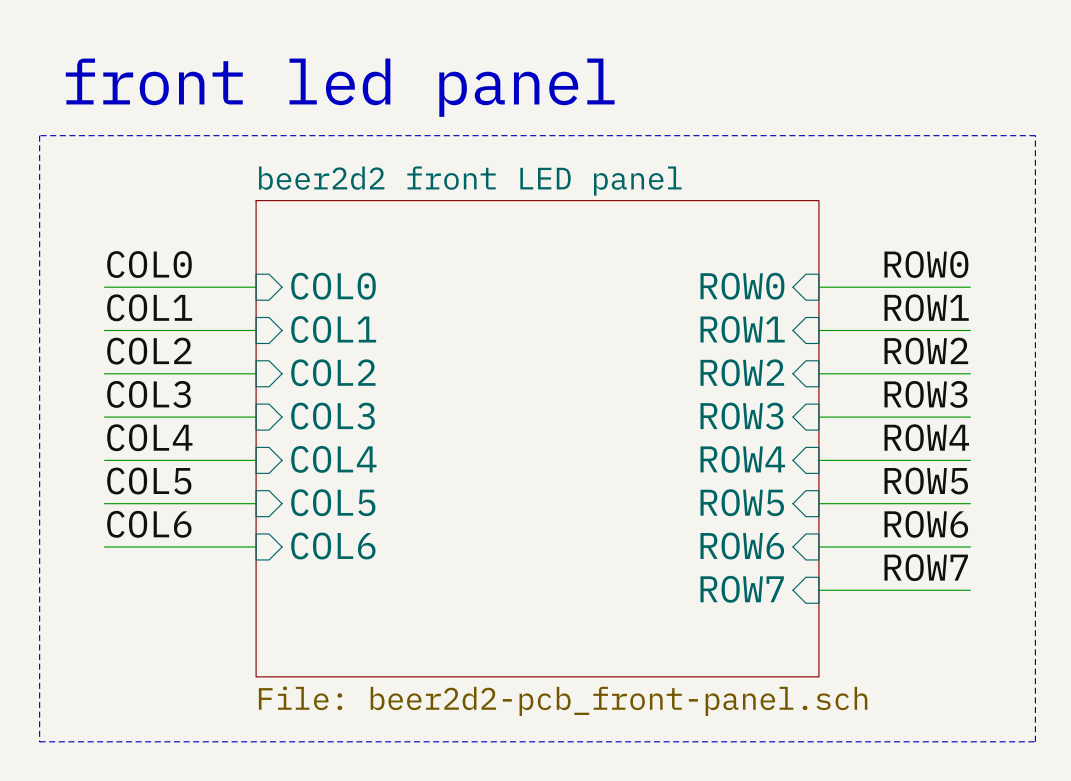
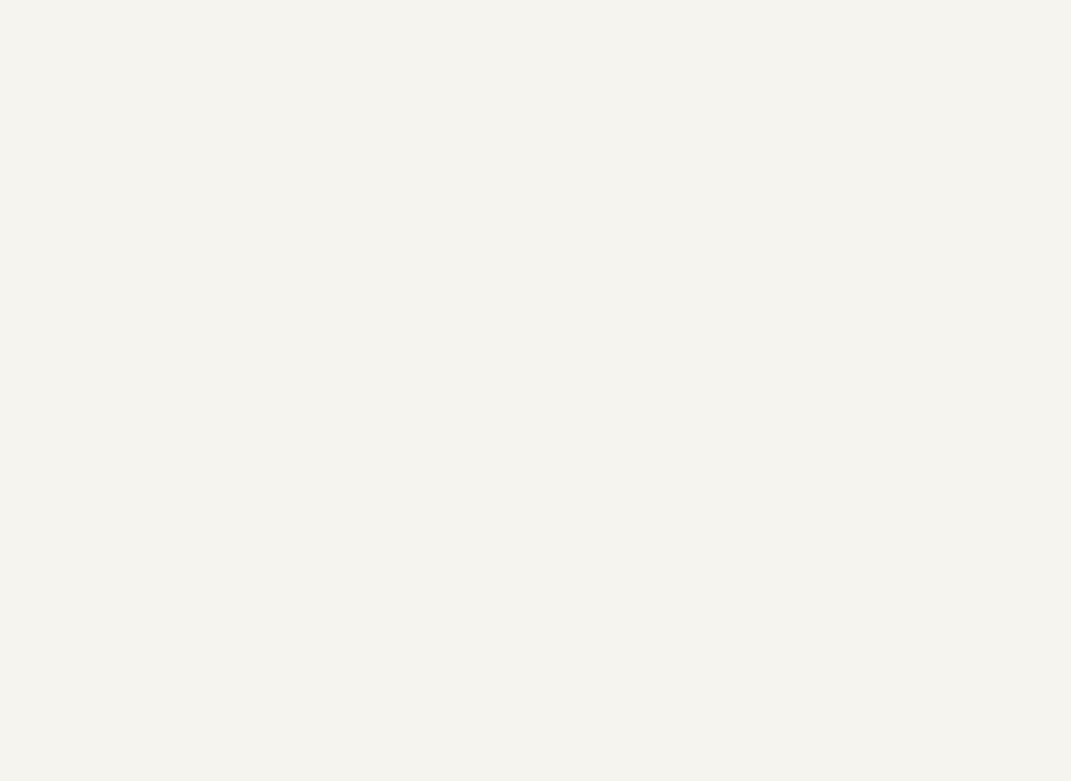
text: front led panel (340, 87) -> none
line: (39, 135) (39, 741) (1035, 741) (1035, 135) (39, 135) -> none
label: COL0 (149, 264) -> none
label: ROW0 (926, 264) -> none
sheet pin: COL0 (333, 286) -> none
sheet pin: ROW0 (742, 286) -> none
wire: (104, 287) (256, 287) -> none
wire: (818, 287) (970, 287) -> none
label: COL1 (149, 307) -> none
label: ROW1 (926, 307) -> none
sheet pin: COL1 (333, 329) -> none
sheet pin: ROW1 (742, 329) -> none
wire: (104, 330) (256, 330) -> none
wire: (818, 330) (970, 330) -> none
label: COL2 (149, 351) -> none
label: ROW2 (926, 351) -> none
sheet pin: COL2 (333, 372) -> none
sheet pin: ROW2 (742, 372) -> none
wire: (104, 373) (256, 373) -> none
wire: (818, 373) (970, 373) -> none
label: COL3 (148, 394) -> none
label: ROW3 (925, 394) -> none
sheet pin: COL3 (333, 416) -> none
sheet pin: ROW3 (741, 416) -> none
wire: (104, 417) (256, 417) -> none
wire: (818, 417) (970, 417) -> none
label: COL4 (149, 437) -> none
label: ROW4 (926, 437) -> none
sheet beer2d2 front LED panel: File: beer2d2-pcb_front-panel.sch (537, 438) -> none
sheet pin: COL4 (333, 459) -> none
sheet pin: ROW4 (742, 459) -> none
wire: (104, 460) (256, 460) -> none
wire: (818, 460) (970, 460) -> none
label: COL5 (149, 481) -> none
label: ROW5 (926, 481) -> none
sheet pin: COL5 (333, 502) -> none
sheet pin: ROW5 (742, 502) -> none
wire: (104, 503) (256, 503) -> none
wire: (818, 503) (970, 503) -> none
label: COL6 (149, 524) -> none
label: ROW6 (926, 524) -> none
wire: (104, 546) (256, 546) -> none
sheet pin: COL6 (333, 546) -> none
sheet pin: ROW6 (742, 546) -> none
wire: (818, 546) (970, 546) -> none
label: ROW7 (926, 567) -> none
sheet pin: ROW7 (742, 589) -> none
wire: (818, 590) (970, 590) -> none

